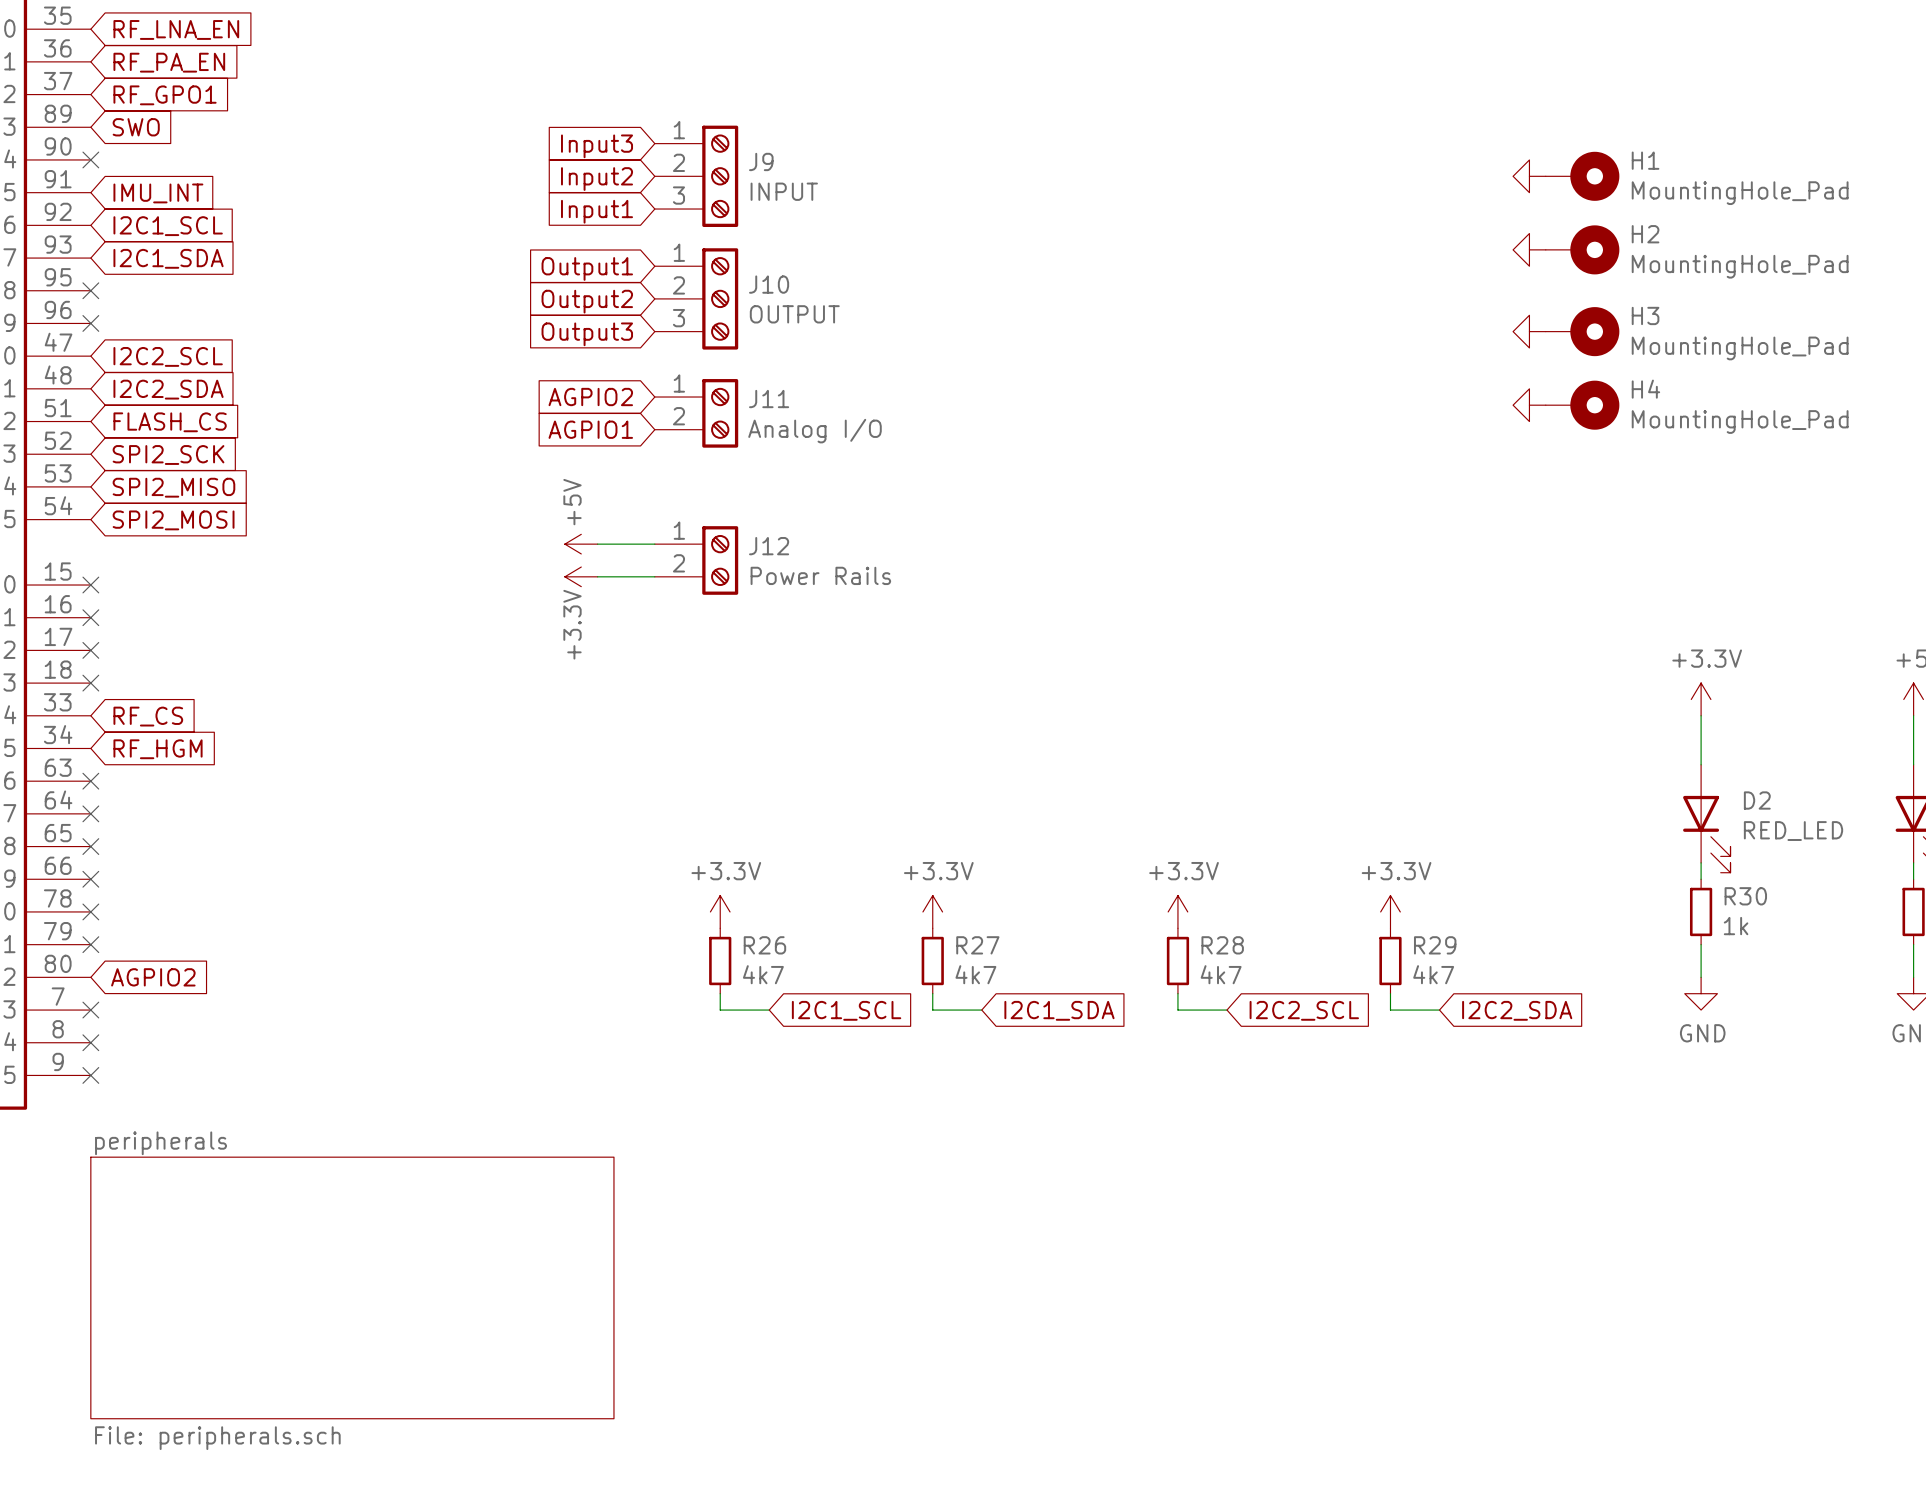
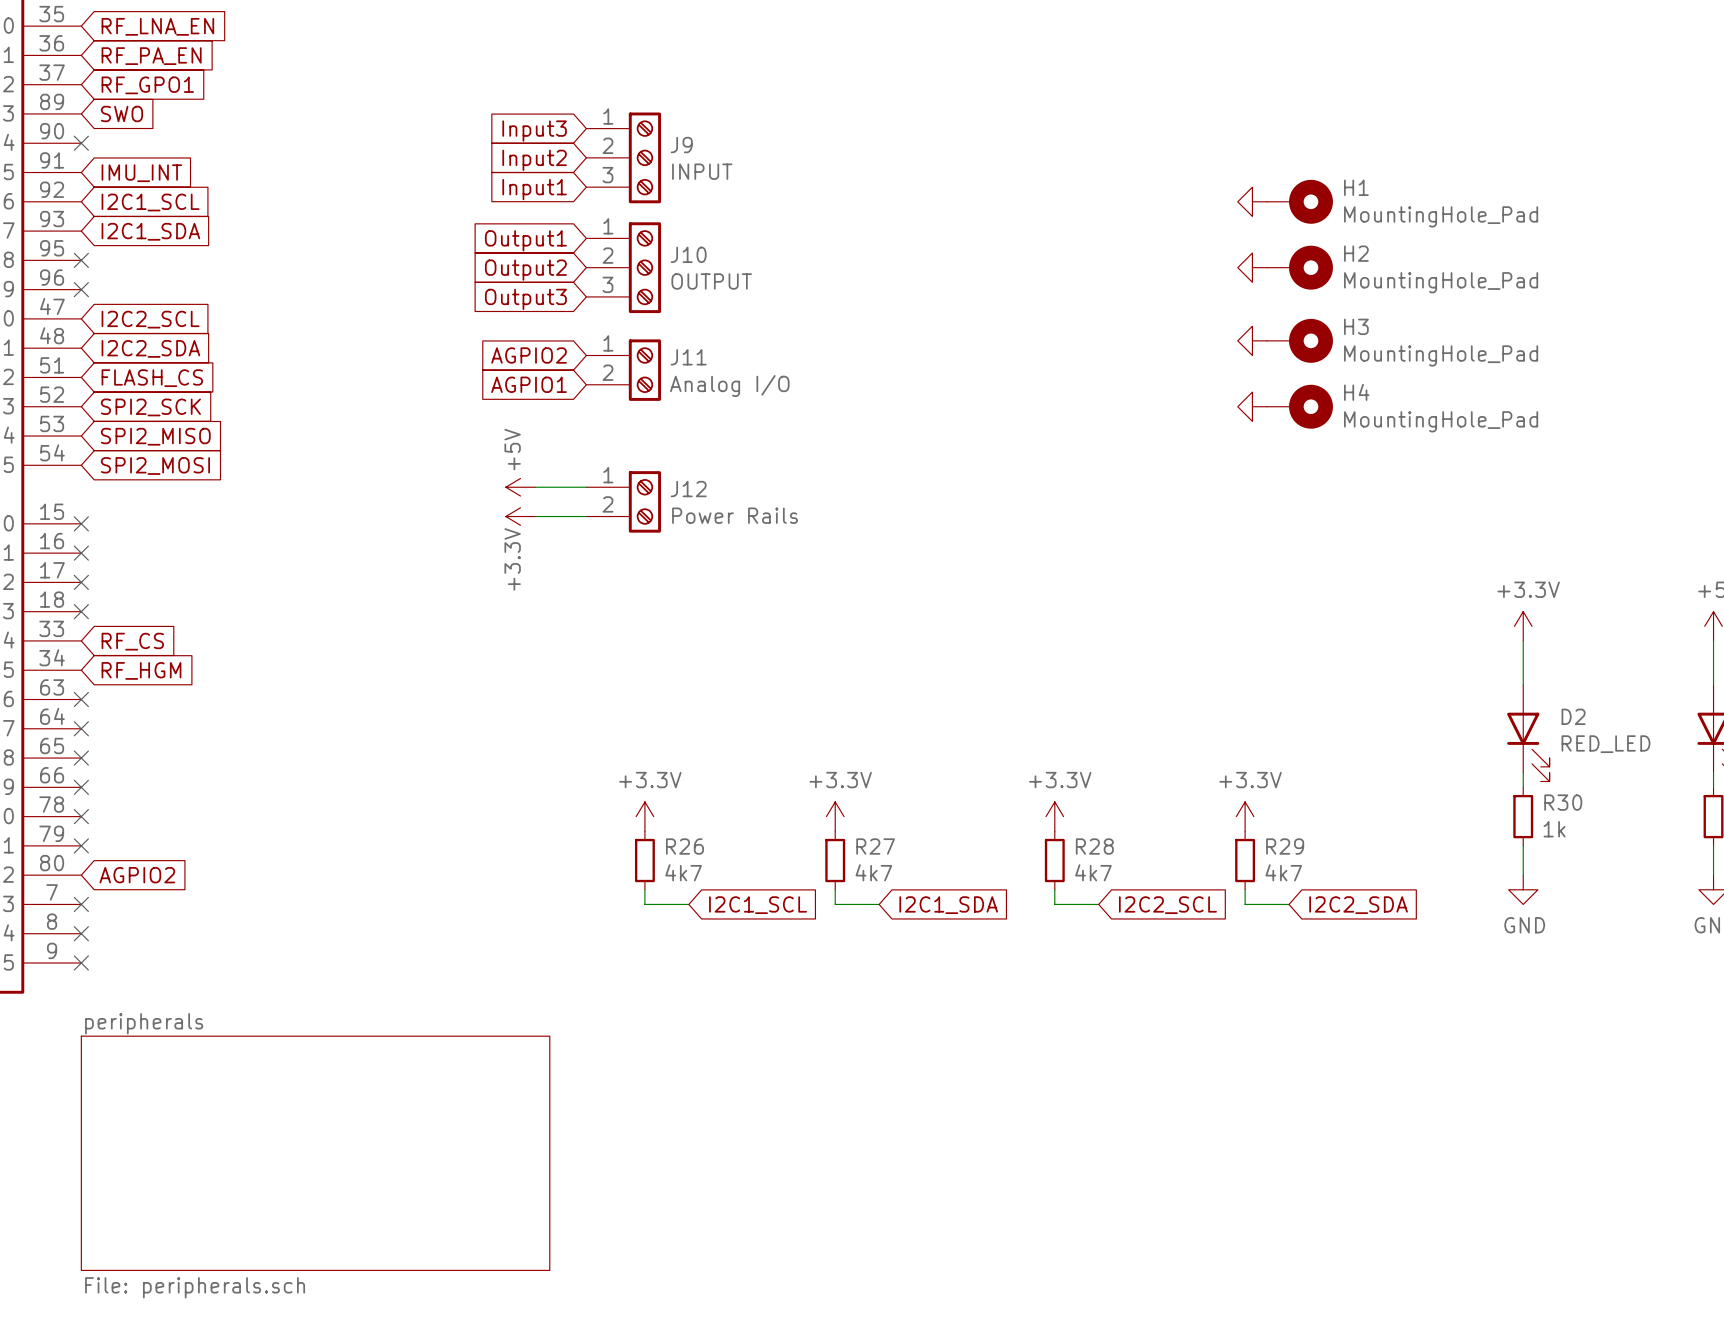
power symbol: (1529, 176) -> none
H1 position: (1582, 176) -> (1300, 201)
power symbol: none -> (1252, 201)
power symbol: (1529, 249) -> none
H2 position: (1582, 249) -> (1300, 267)
power symbol: none -> (1252, 267)
power symbol: (1529, 331) -> none
H3 position: (1582, 331) -> (1300, 340)
power symbol: none -> (1252, 340)
power symbol: (1529, 405) -> none
H4 position: (1582, 405) -> (1300, 406)
power symbol: none -> (1252, 406)

